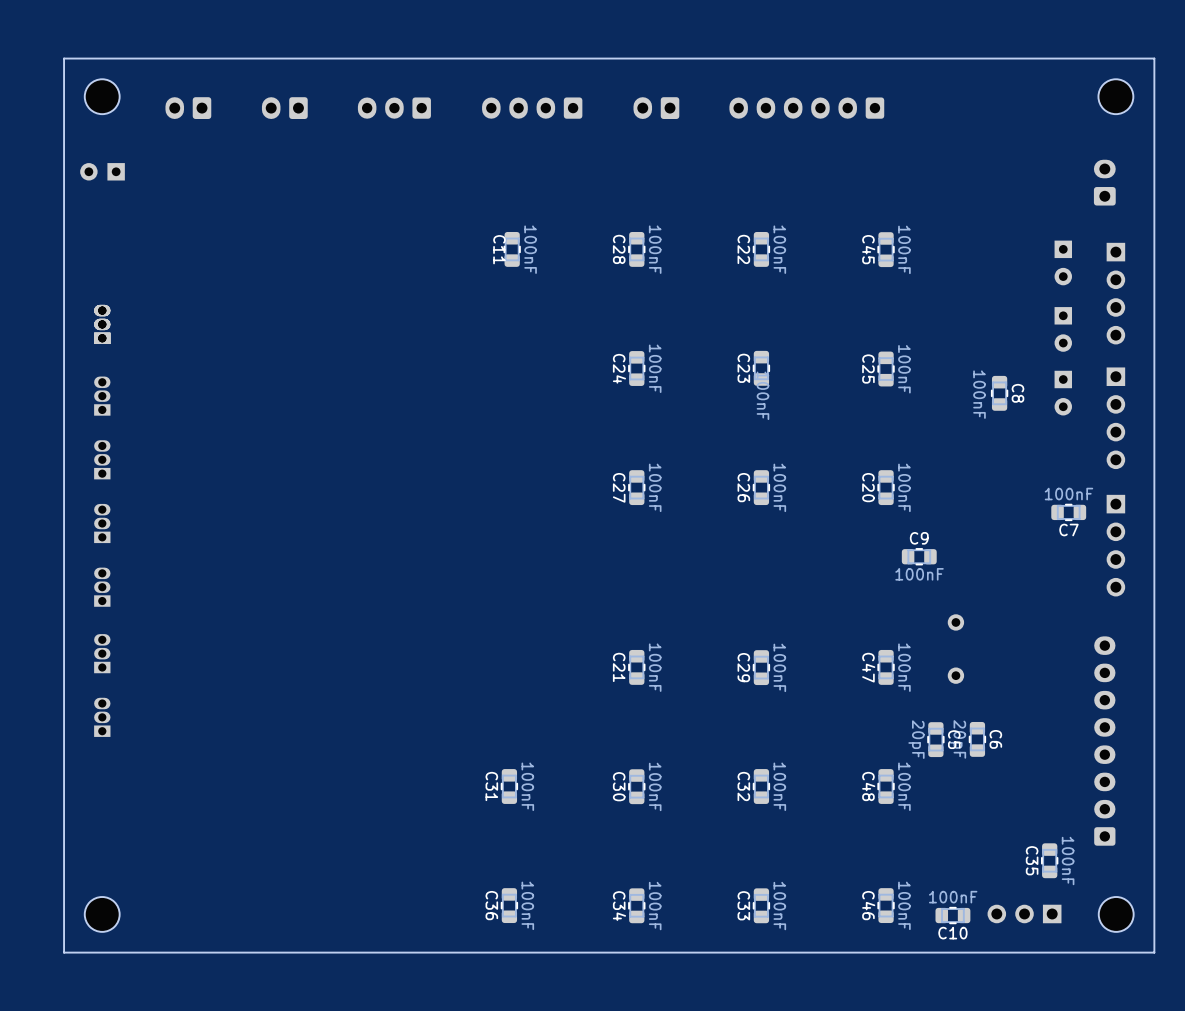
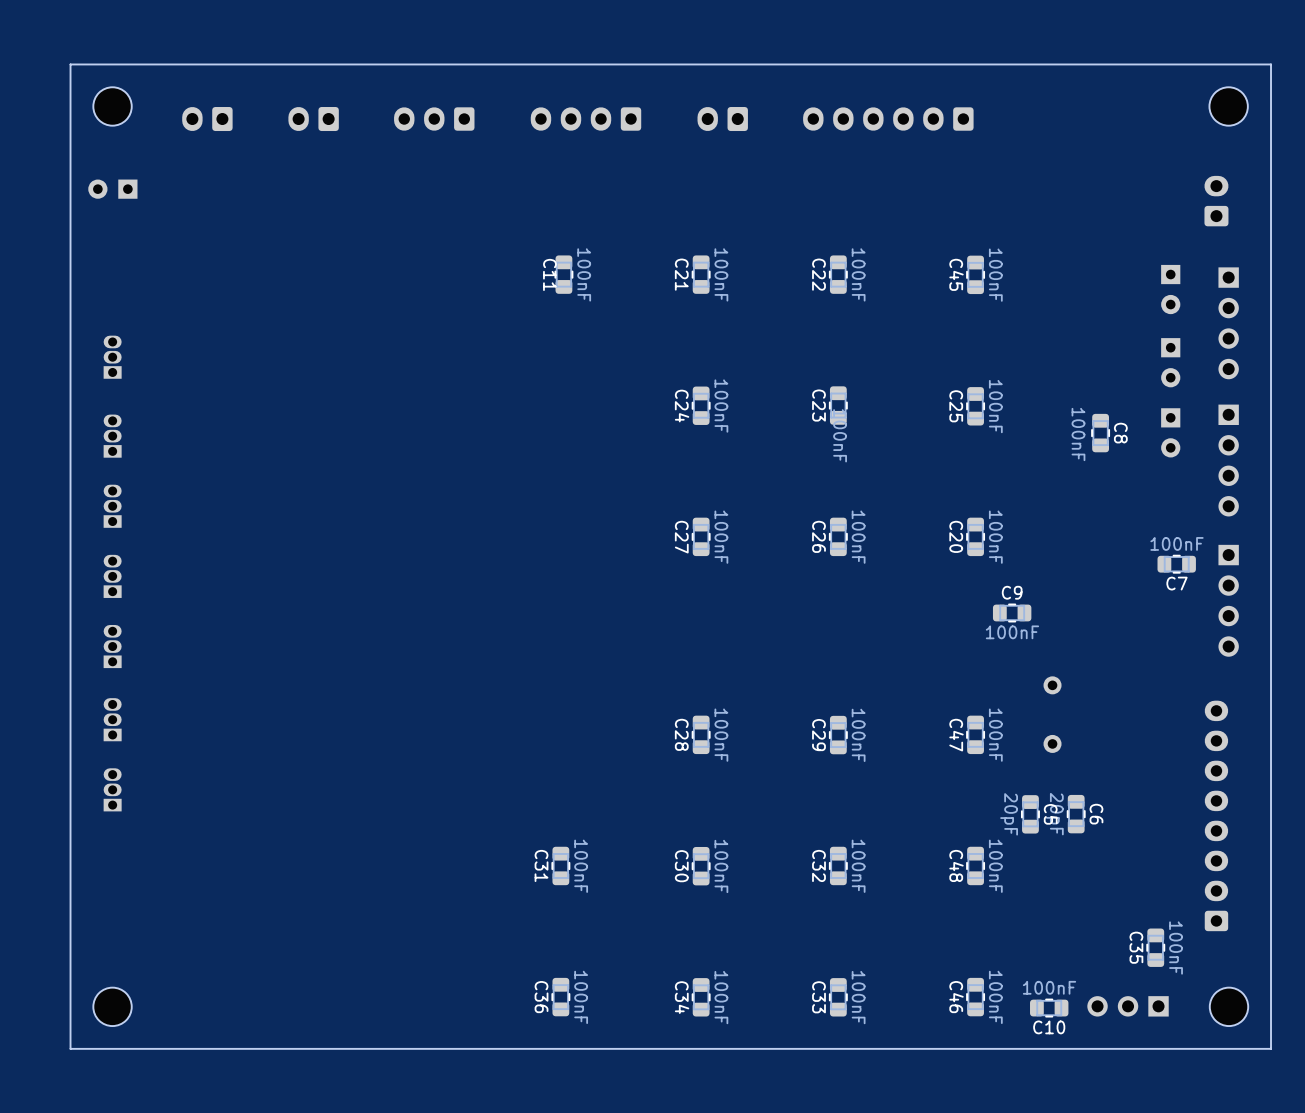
C28 name: C28 (619, 249) -> C21 (681, 274)
part: (102, 324) -> none
C21 name: C21 (619, 667) -> C28 (681, 734)

